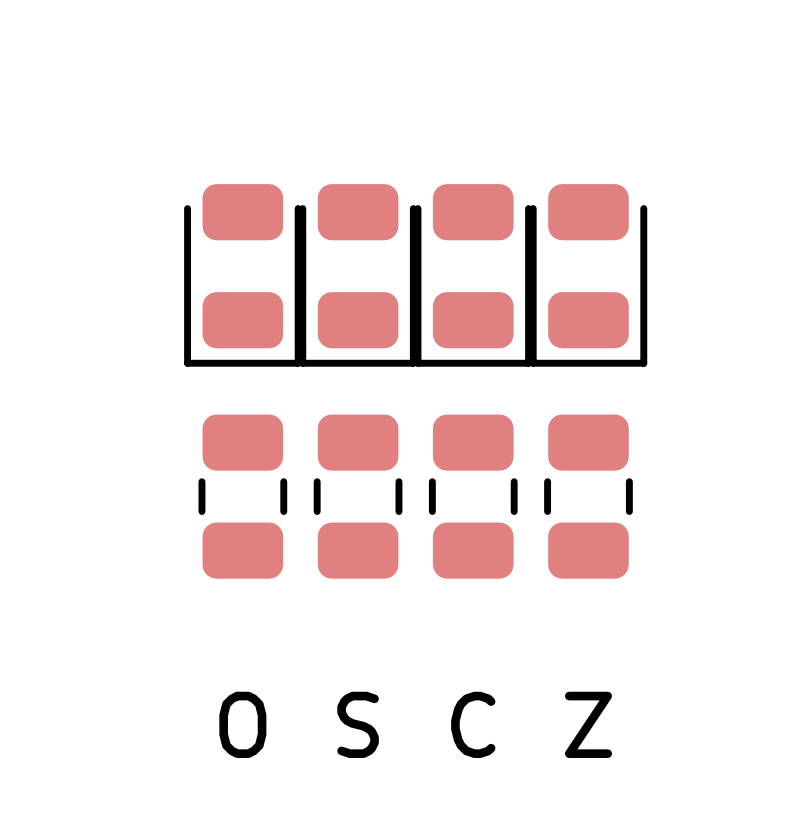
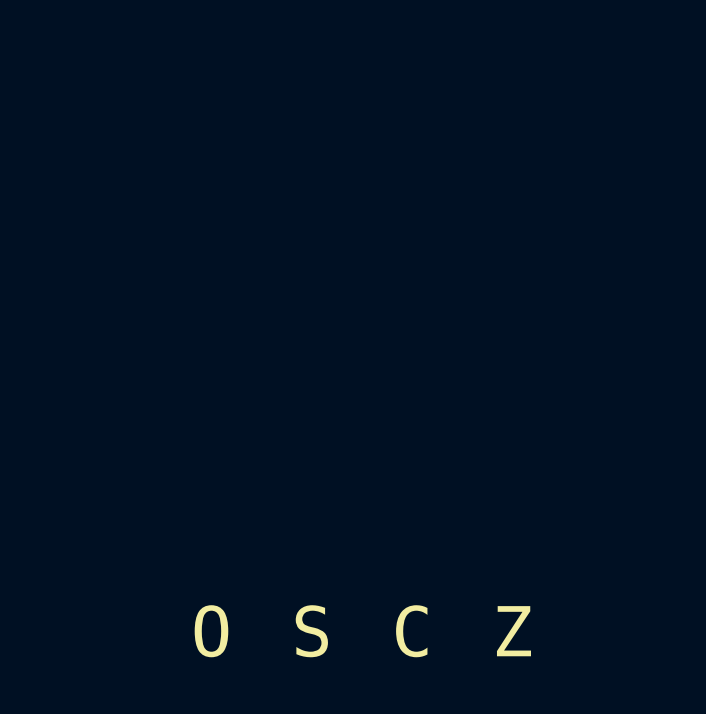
part: (242, 275) -> none
part: (358, 275) -> none
part: (473, 275) -> none
part: (588, 275) -> none
part: (242, 496) -> none
part: (358, 496) -> none
part: (473, 496) -> none
part: (588, 496) -> none

